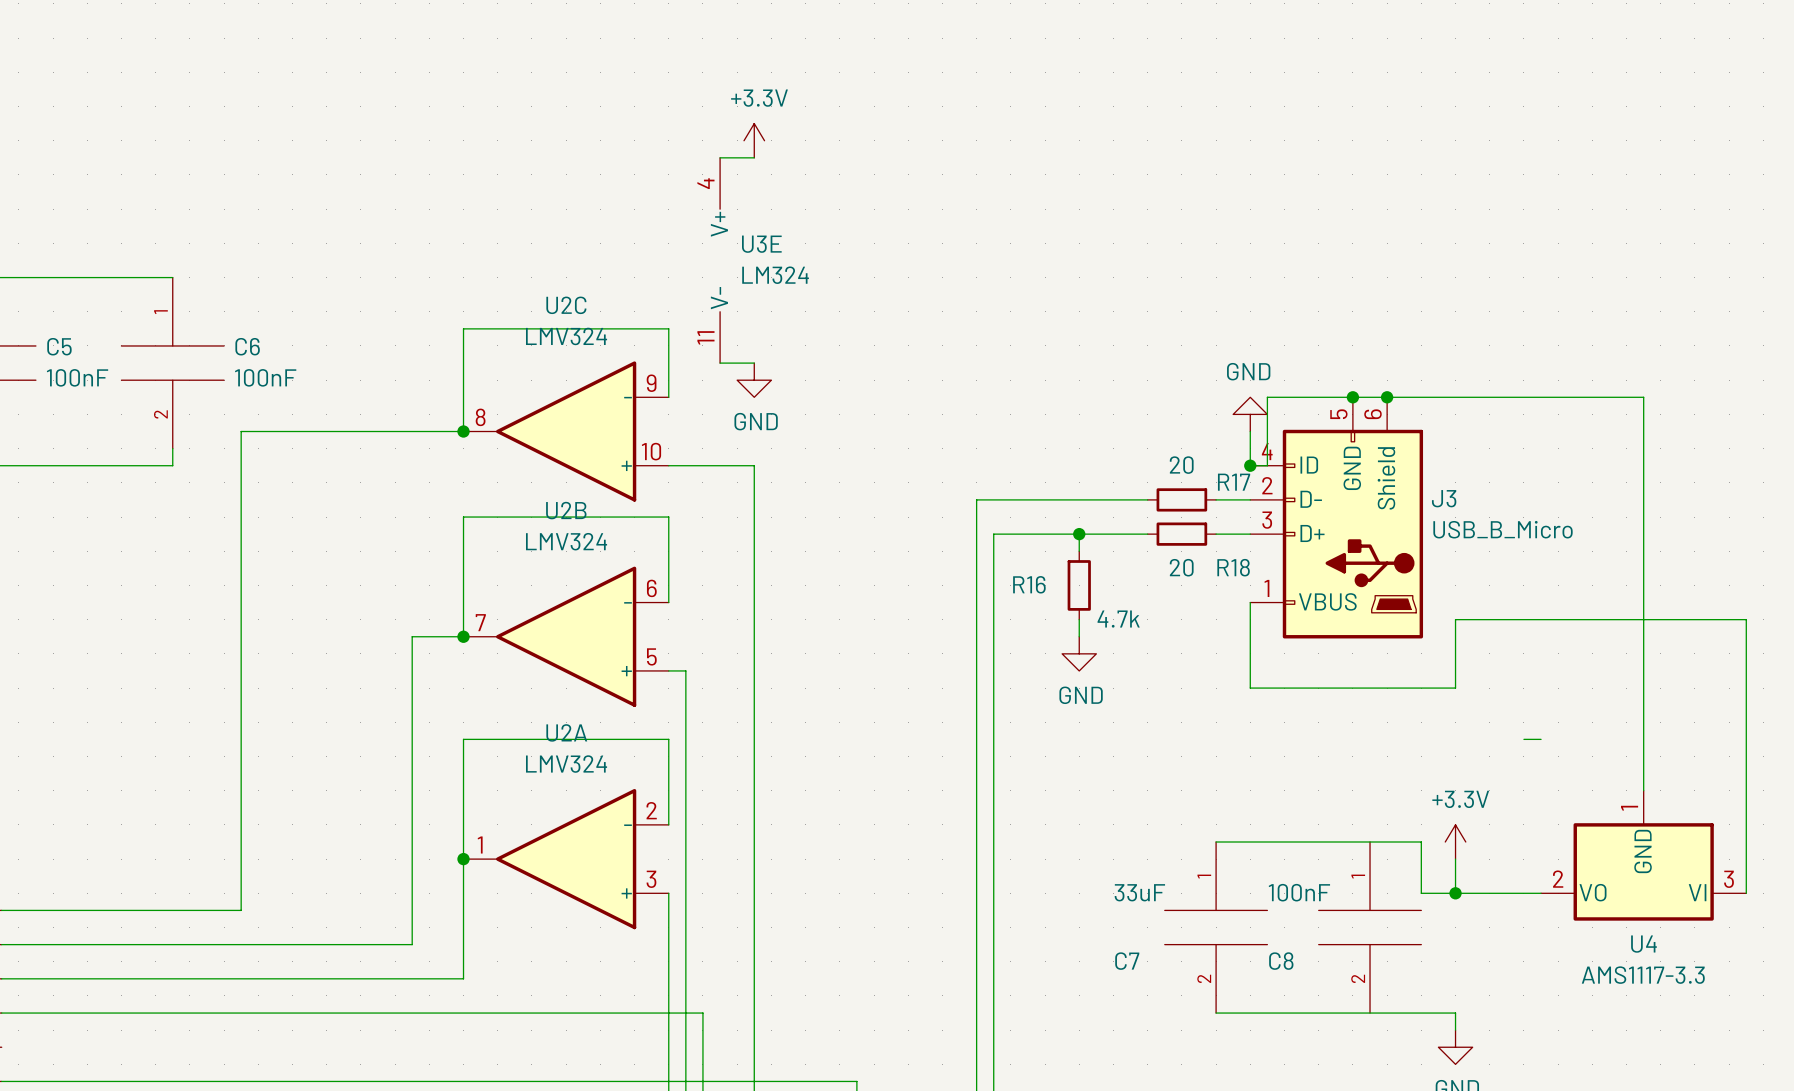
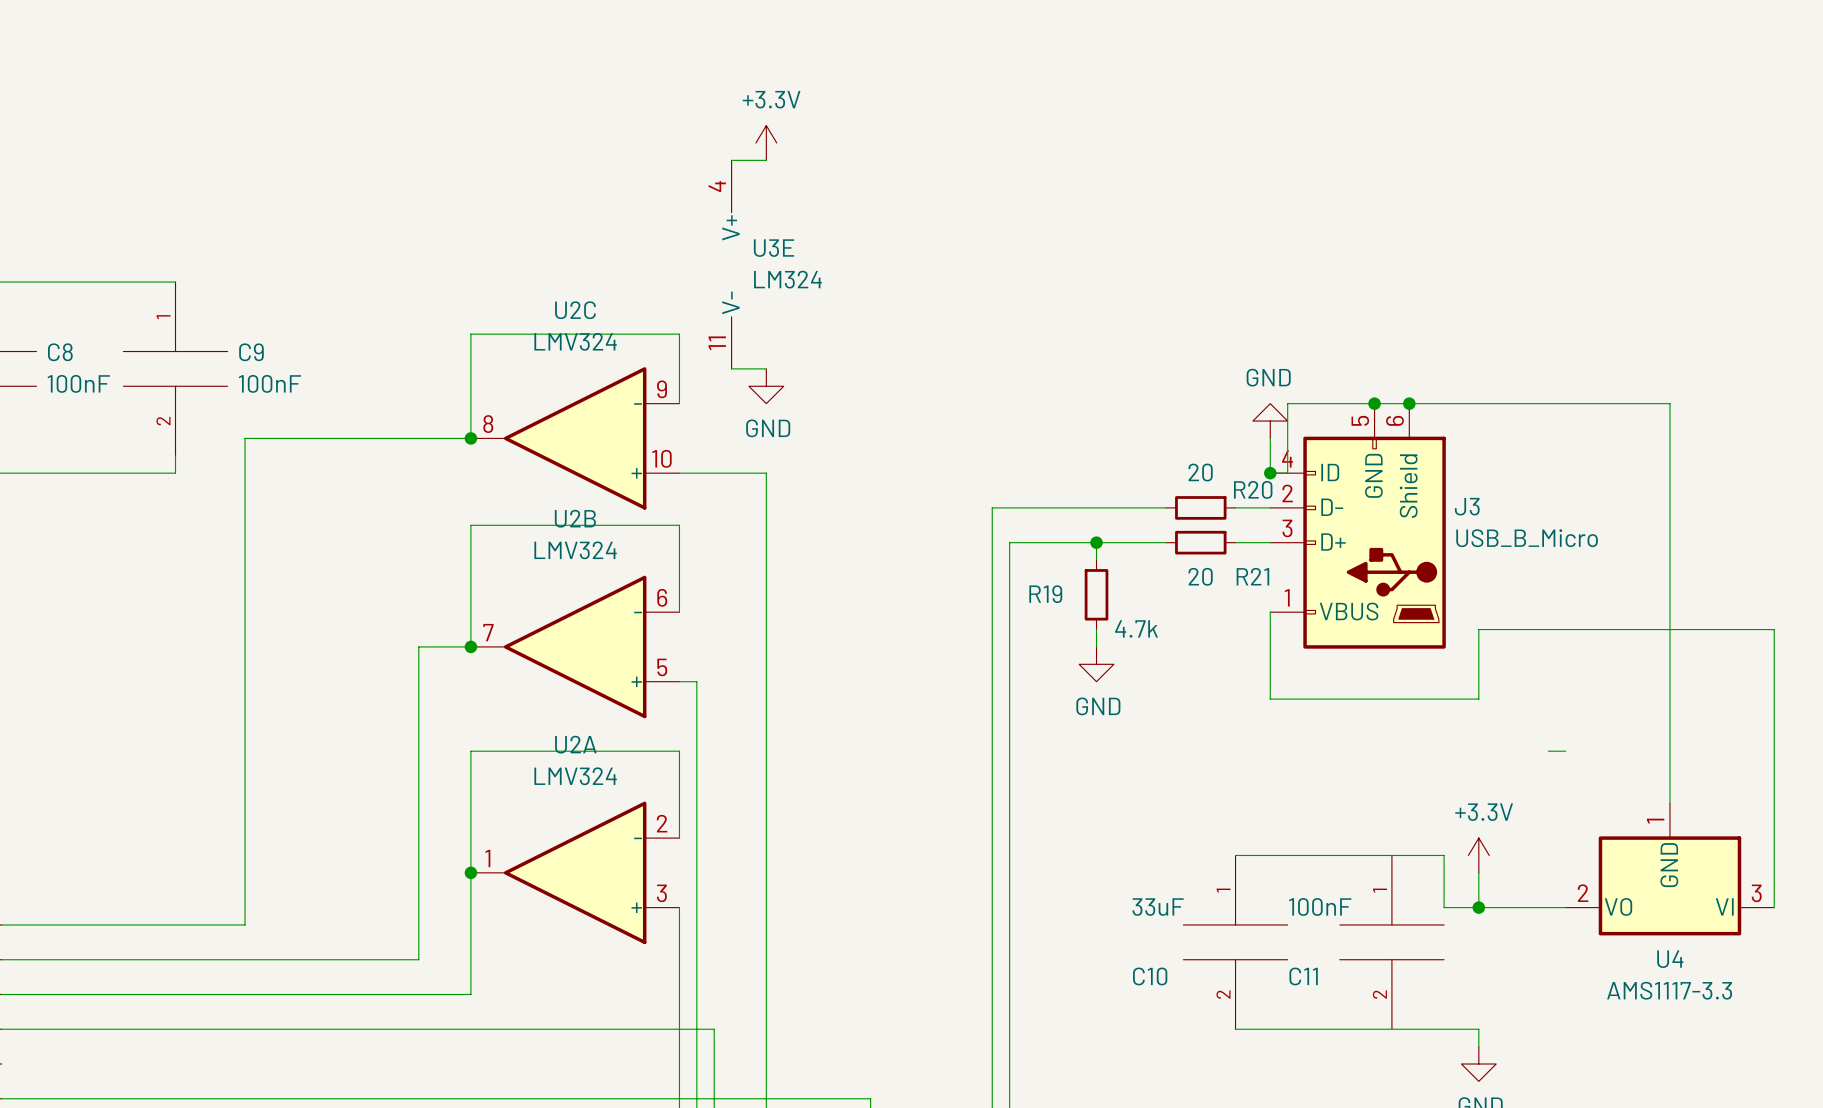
C5 name: C5 (59, 346) -> C8 (60, 352)
C6 name: C6 (247, 346) -> C9 (251, 352)
R17 name: R17 (1234, 482) -> R20 (1253, 489)
R18 name: R18 (1233, 567) -> R21 (1252, 576)
R16 name: R16 (1029, 584) -> R19 (1045, 594)
C7 name: C7 (1127, 961) -> C10 (1150, 976)
C8 name: C8 (1281, 961) -> C11 (1303, 976)

